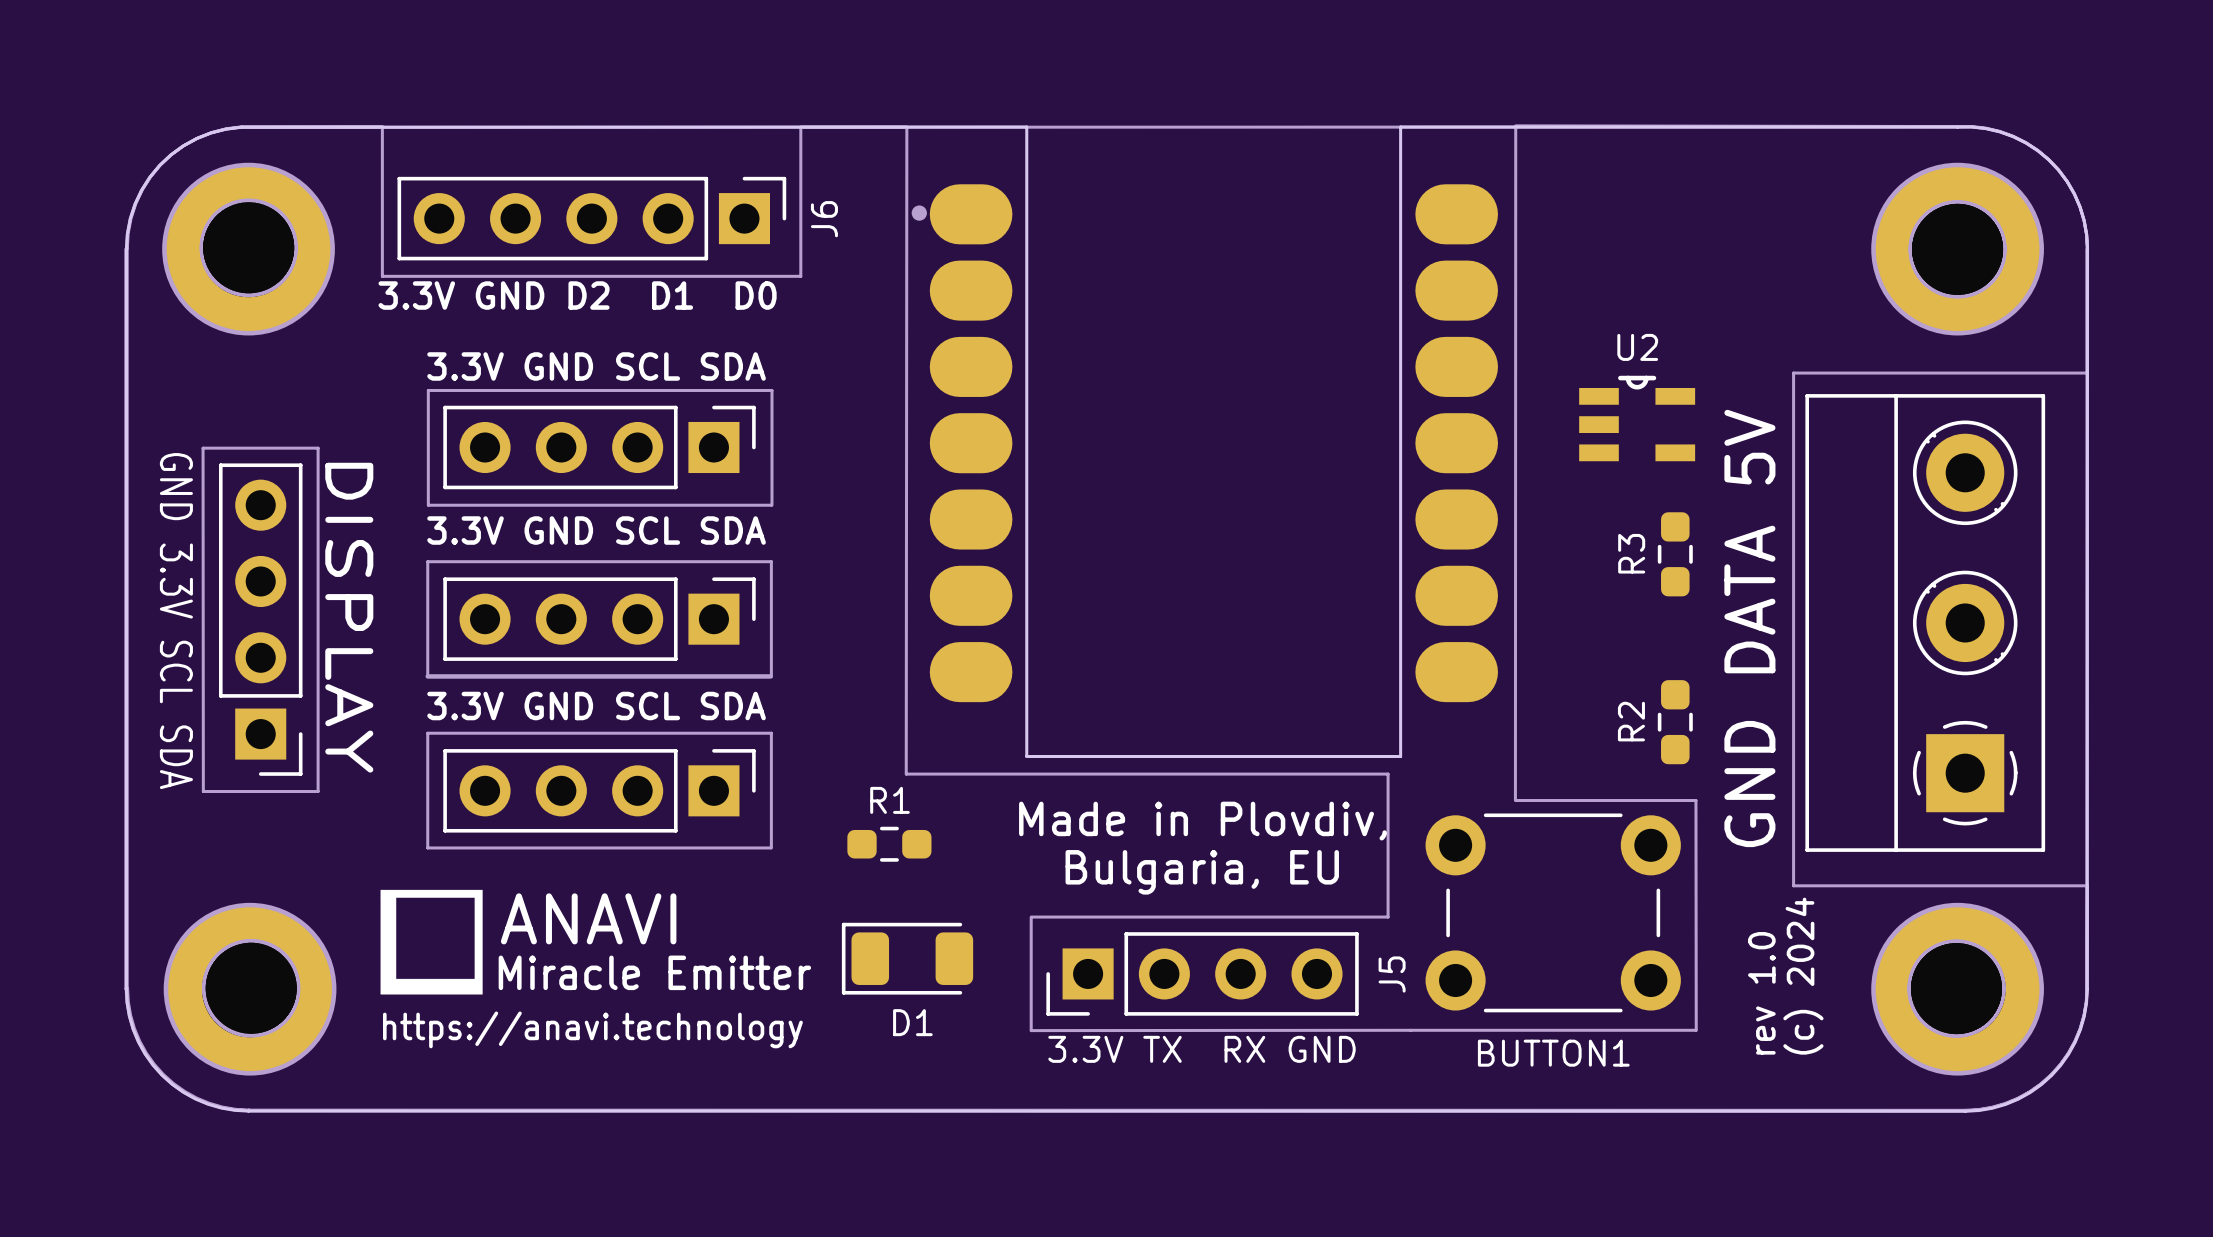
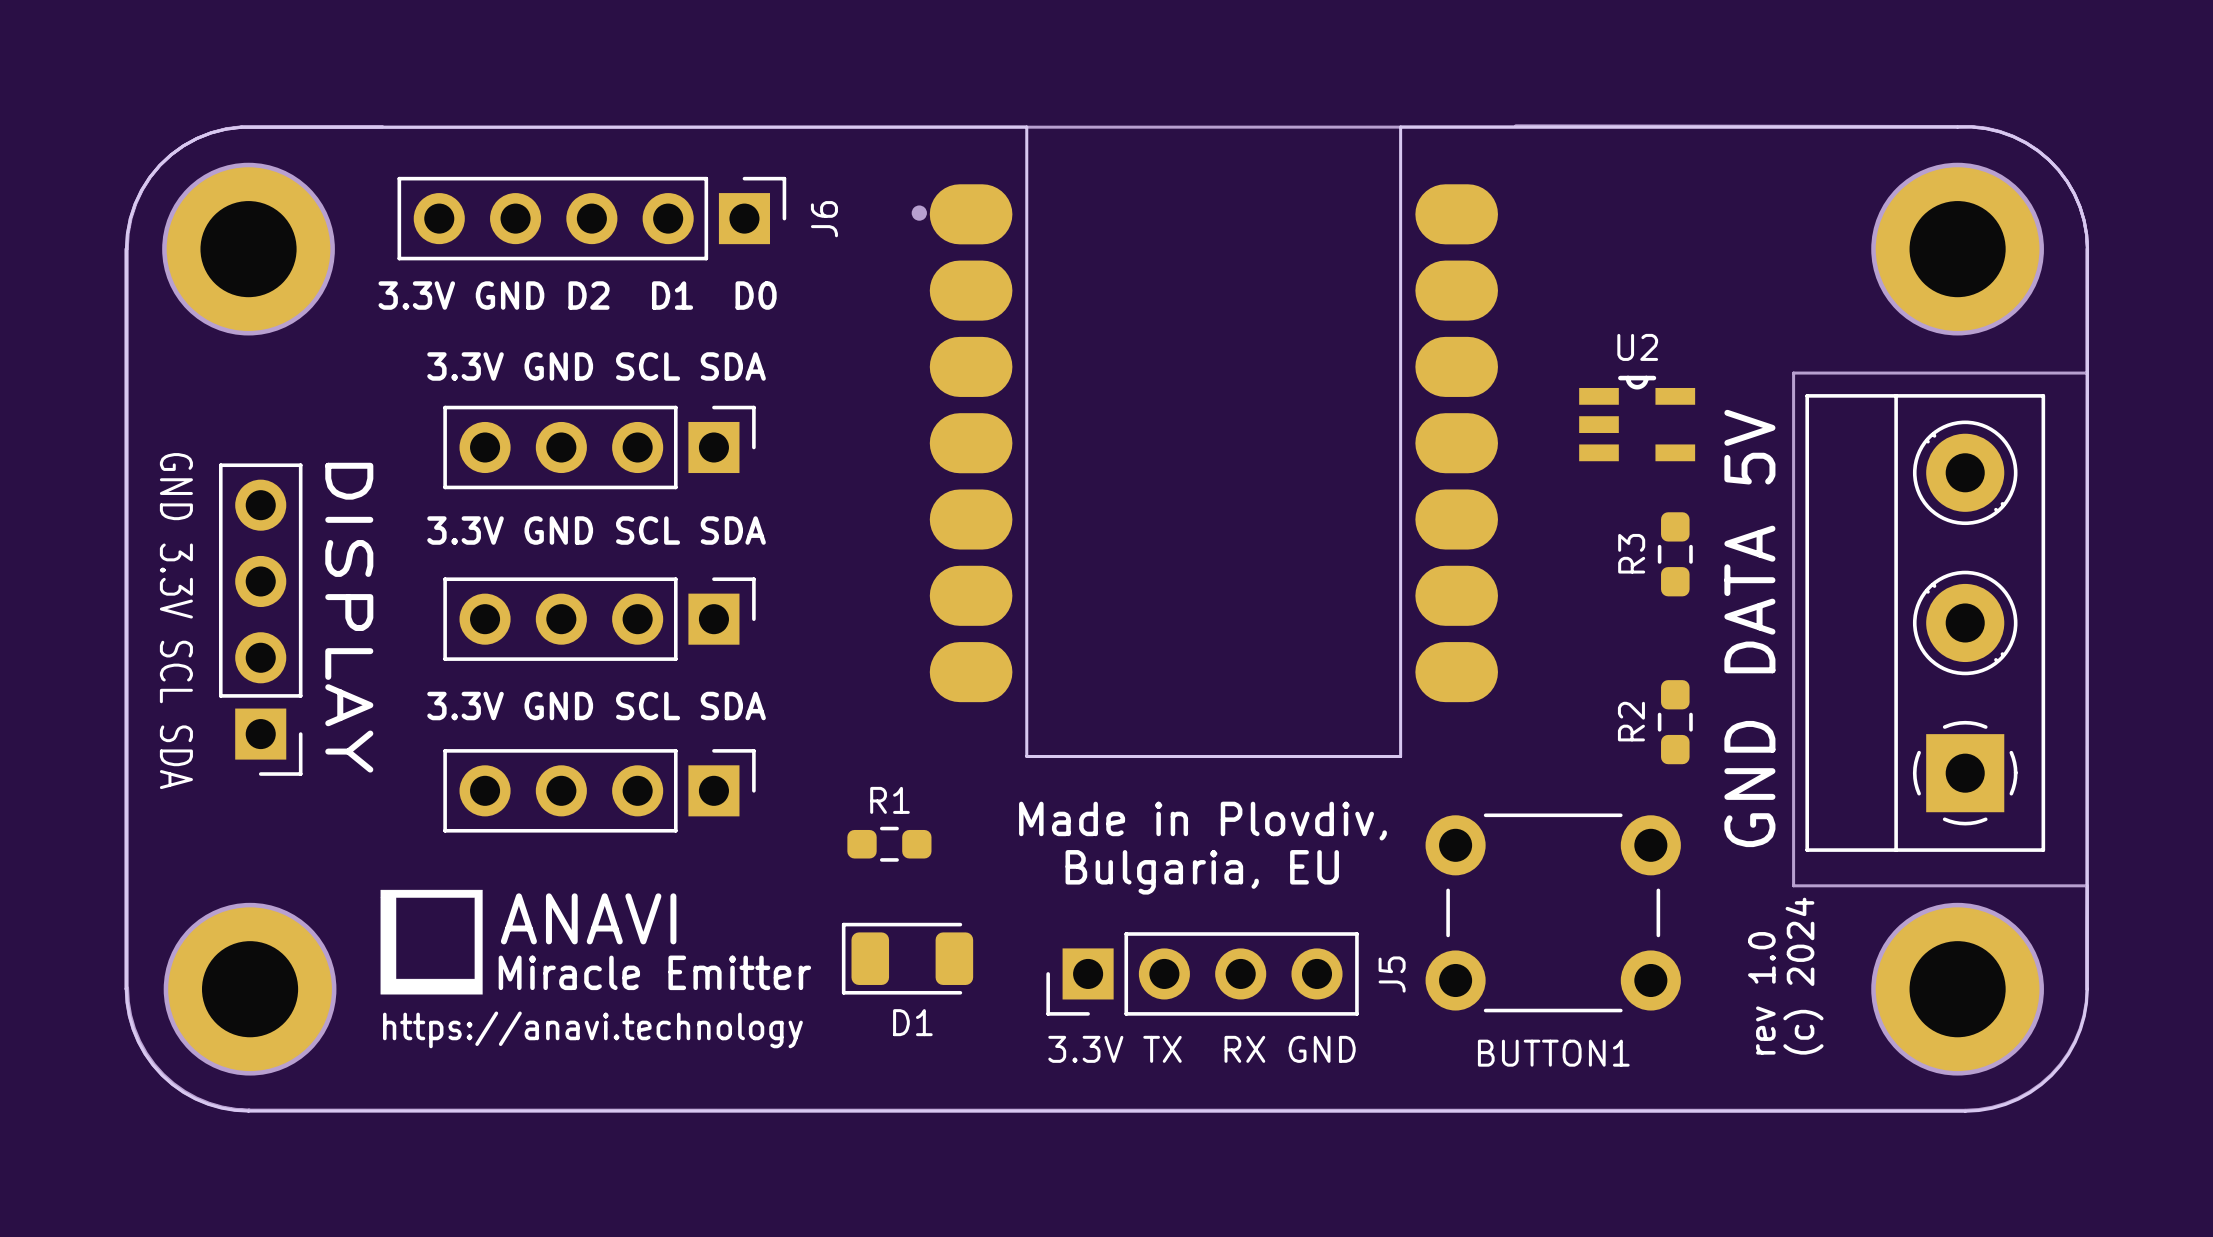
line: (382, 127) (382, 276) (800, 276) (800, 127) -> none
line: (906, 127) (906, 774) (1388, 774) (1388, 917) (1031, 917) -> none
line: (1515, 127) (1515, 799) -> none
drawing: [199, 198, 298, 298] -> none
drawing: [1908, 200, 2007, 299] -> none
line: (203, 448) (203, 791) (318, 791) (318, 448) (203, 448) -> none
line: (771, 505) (428, 505) (428, 390) (771, 390) (771, 505) -> none
line: (770, 676) (427, 676) (427, 561) (771, 561) (771, 676) -> none
line: (1515, 800) (1695, 800) (1696, 1030) -> none
line: (770, 847) (427, 847) (427, 733) (771, 733) (771, 847) -> none
line: (1031, 917) (1031, 1030) (1410, 1030) -> none
drawing: [202, 938, 301, 1038] -> none
drawing: [1907, 939, 2006, 1038] -> none
line: (1410, 1030) (1695, 1030) -> none

